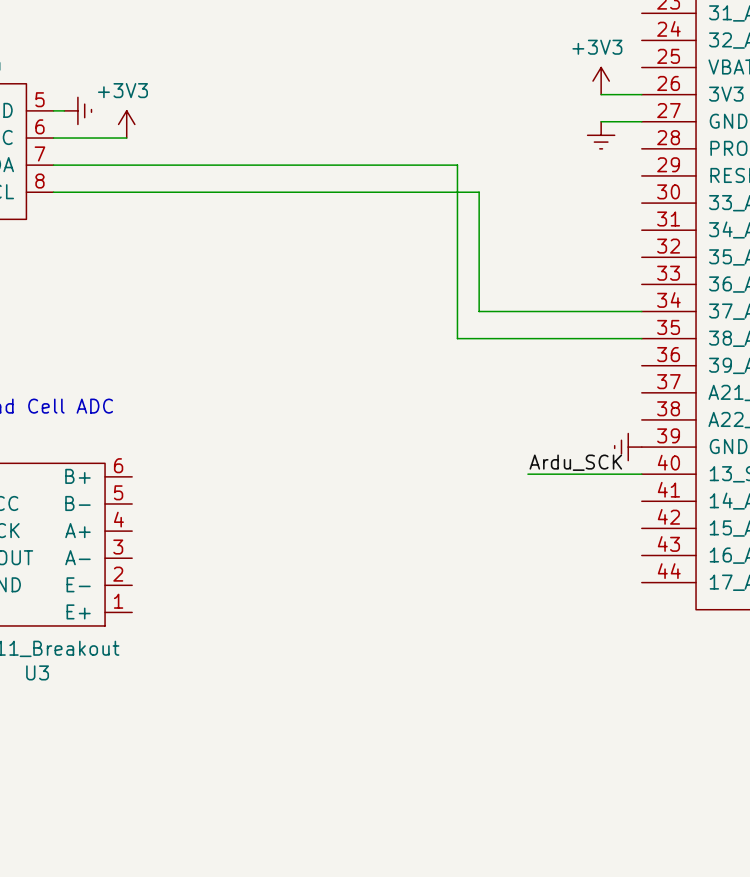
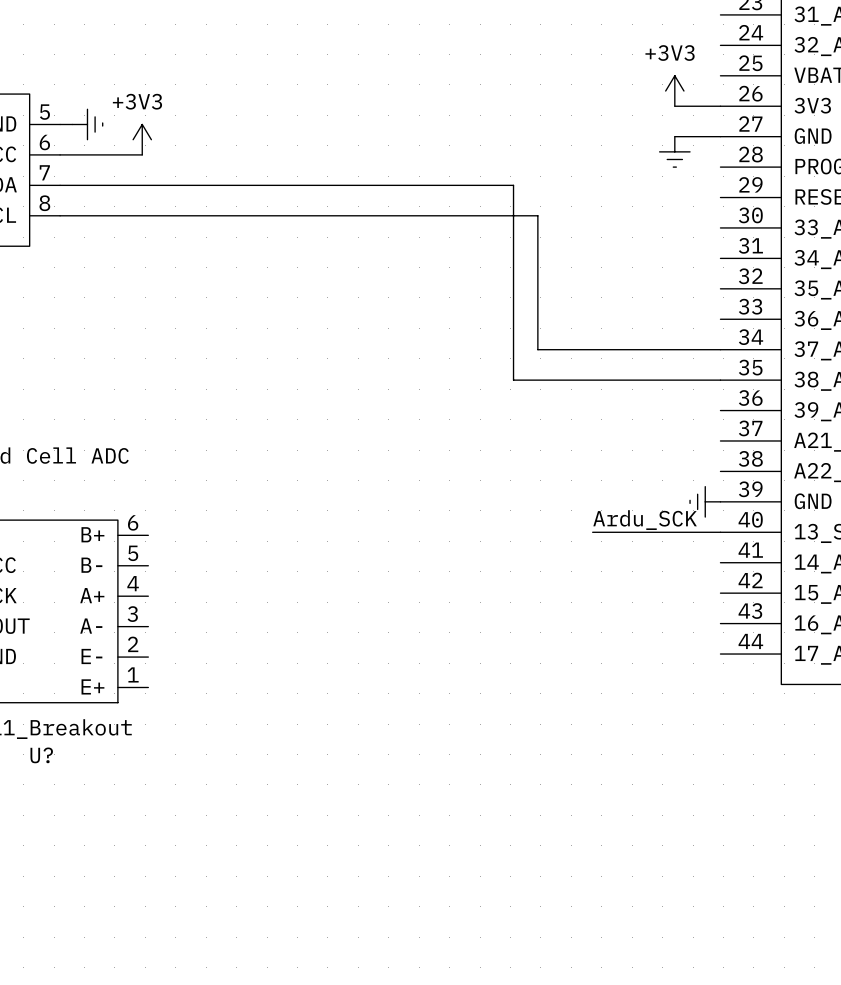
U3 name: U3 (37, 672) -> U? (41, 755)

